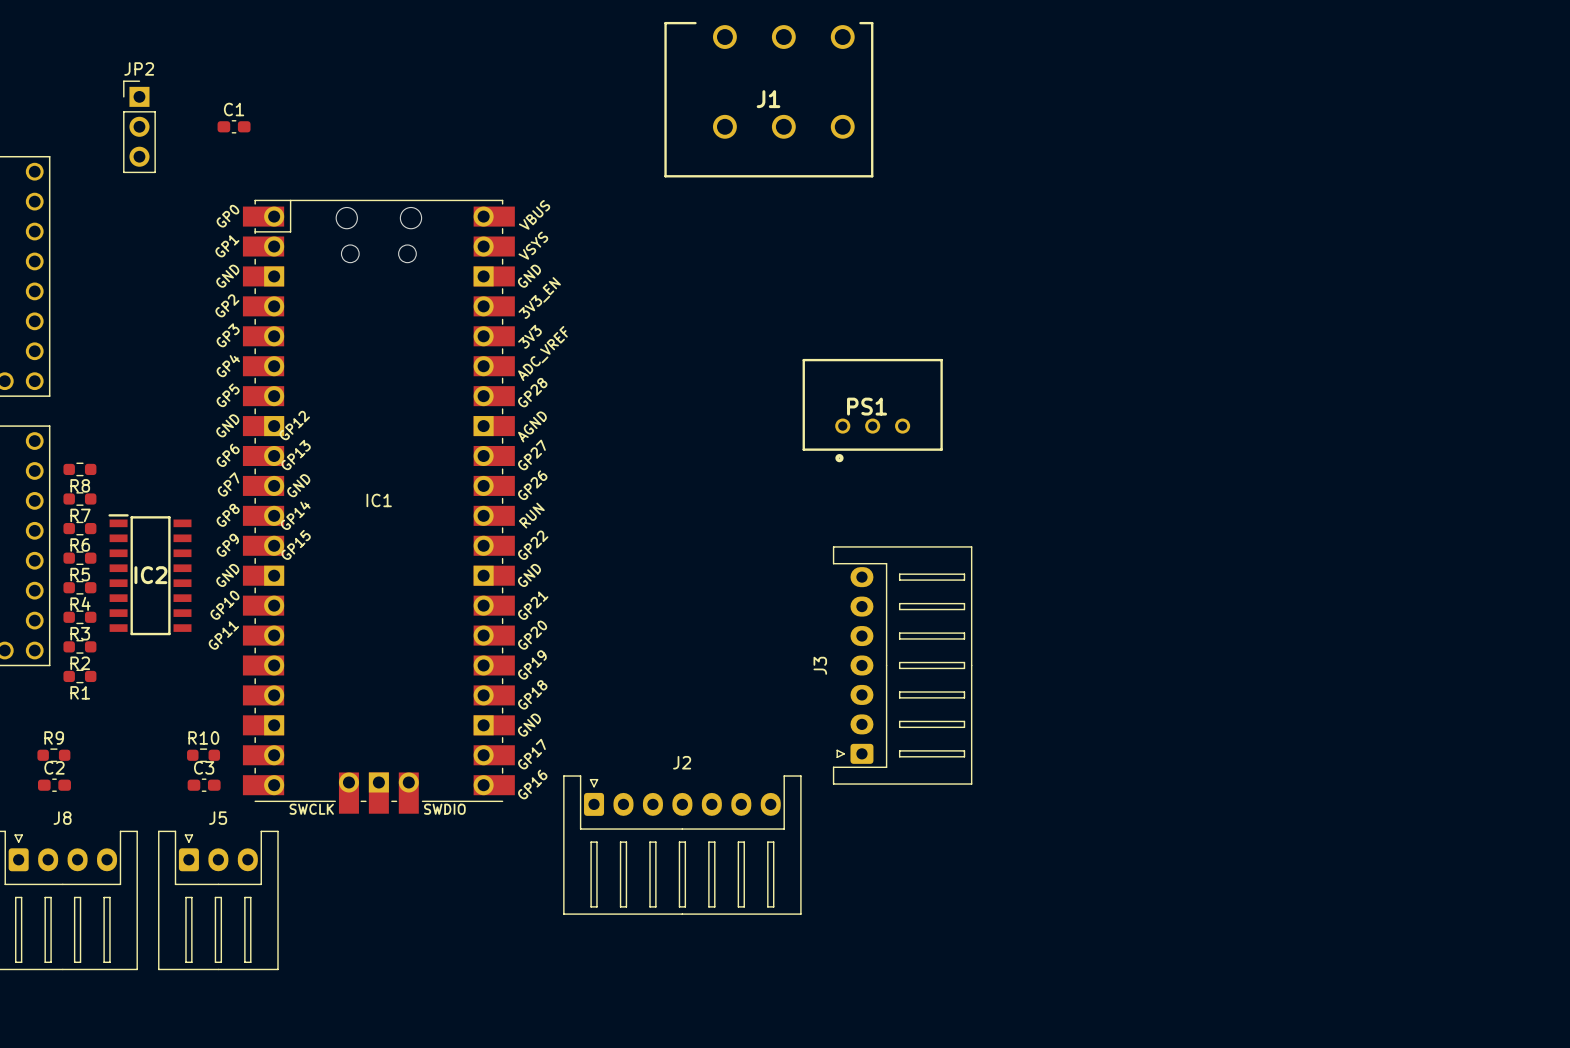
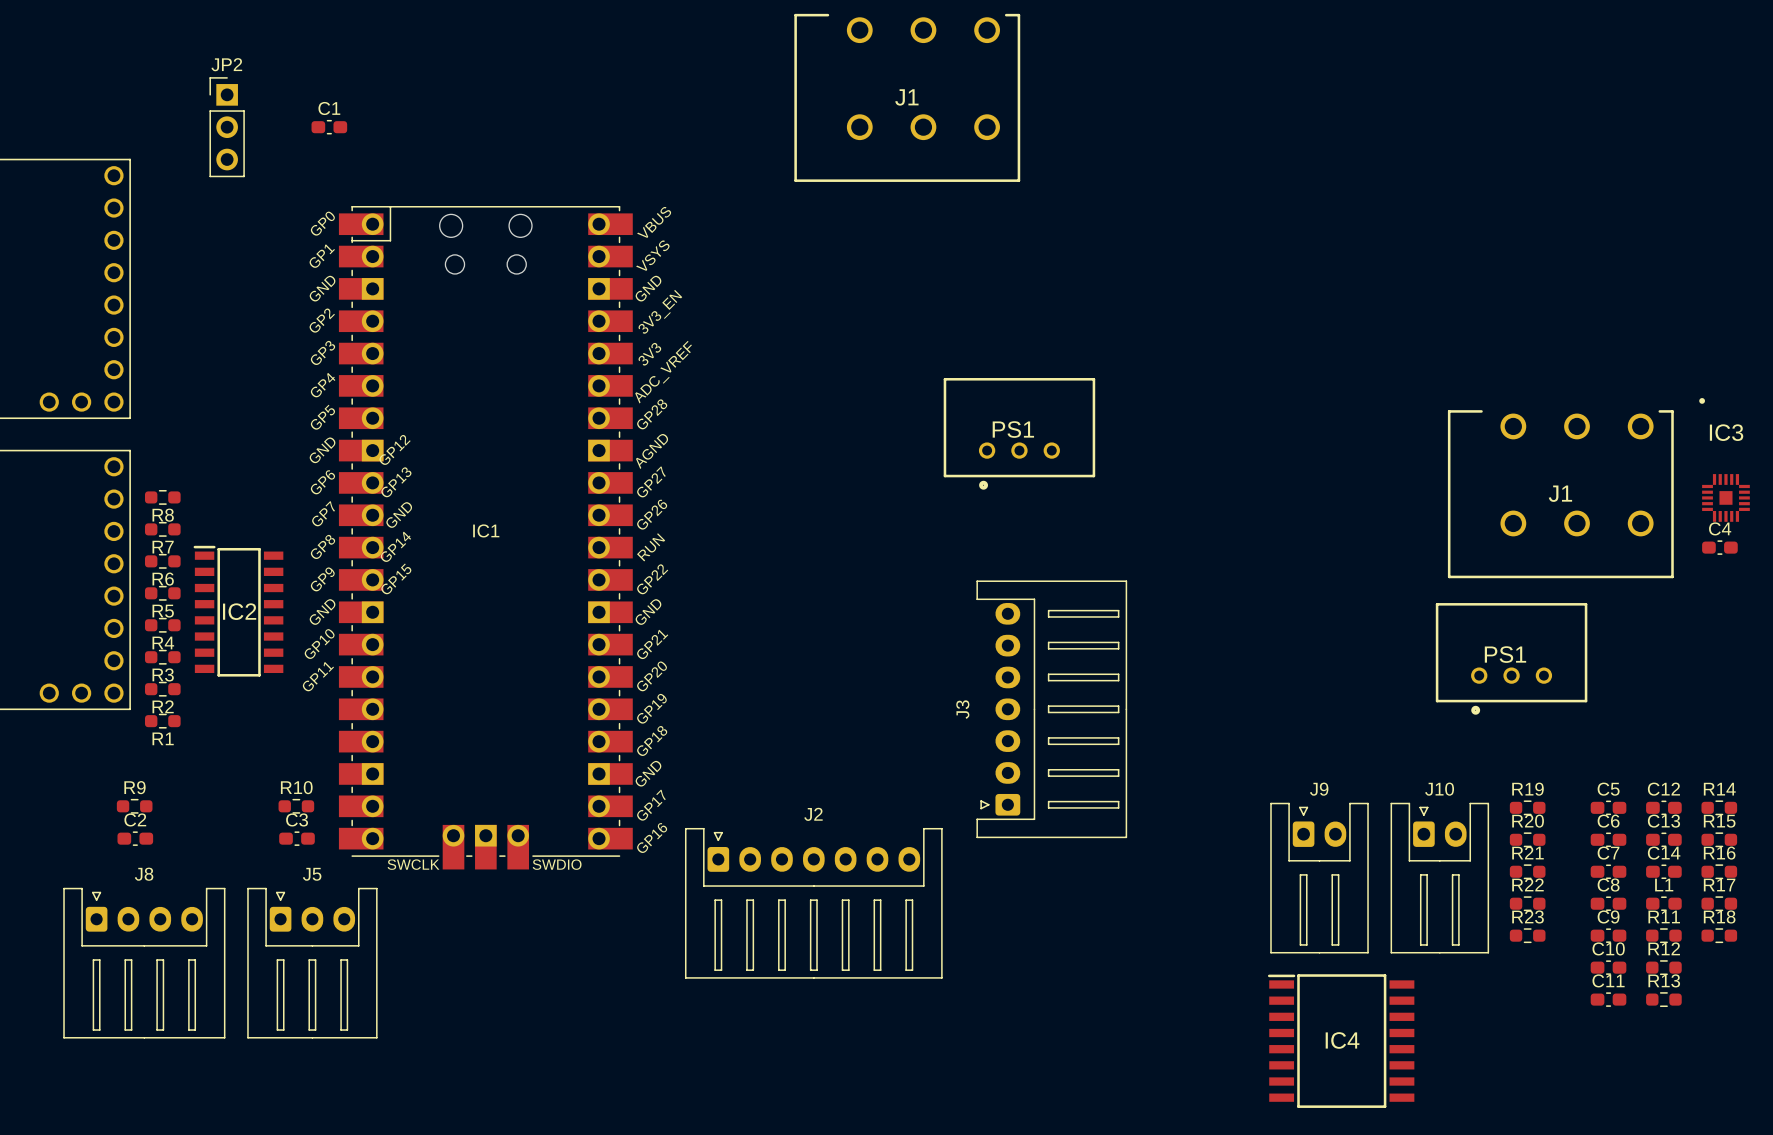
IC3: none -> (1724, 459)
J1: none -> (1560, 494)
C4: none -> (1719, 547)
PS1: none -> (1511, 658)
R19: none -> (1527, 807)
C5: none -> (1608, 807)
C12: none -> (1663, 807)
R14: none -> (1719, 807)
R20: none -> (1527, 839)
C6: none -> (1608, 839)
C13: none -> (1663, 839)
R15: none -> (1719, 839)
R21: none -> (1527, 871)
C7: none -> (1608, 871)
C14: none -> (1663, 871)
R16: none -> (1719, 871)
J9: none -> (1319, 878)
J10: none -> (1439, 878)
R22: none -> (1527, 903)
C8: none -> (1608, 903)
L1: none -> (1663, 903)
R17: none -> (1719, 903)
R23: none -> (1527, 935)
C9: none -> (1608, 935)
R11: none -> (1663, 935)
R18: none -> (1719, 935)
C10: none -> (1608, 967)
R12: none -> (1663, 967)
C11: none -> (1608, 999)
R13: none -> (1663, 999)
IC4: none -> (1341, 1041)

